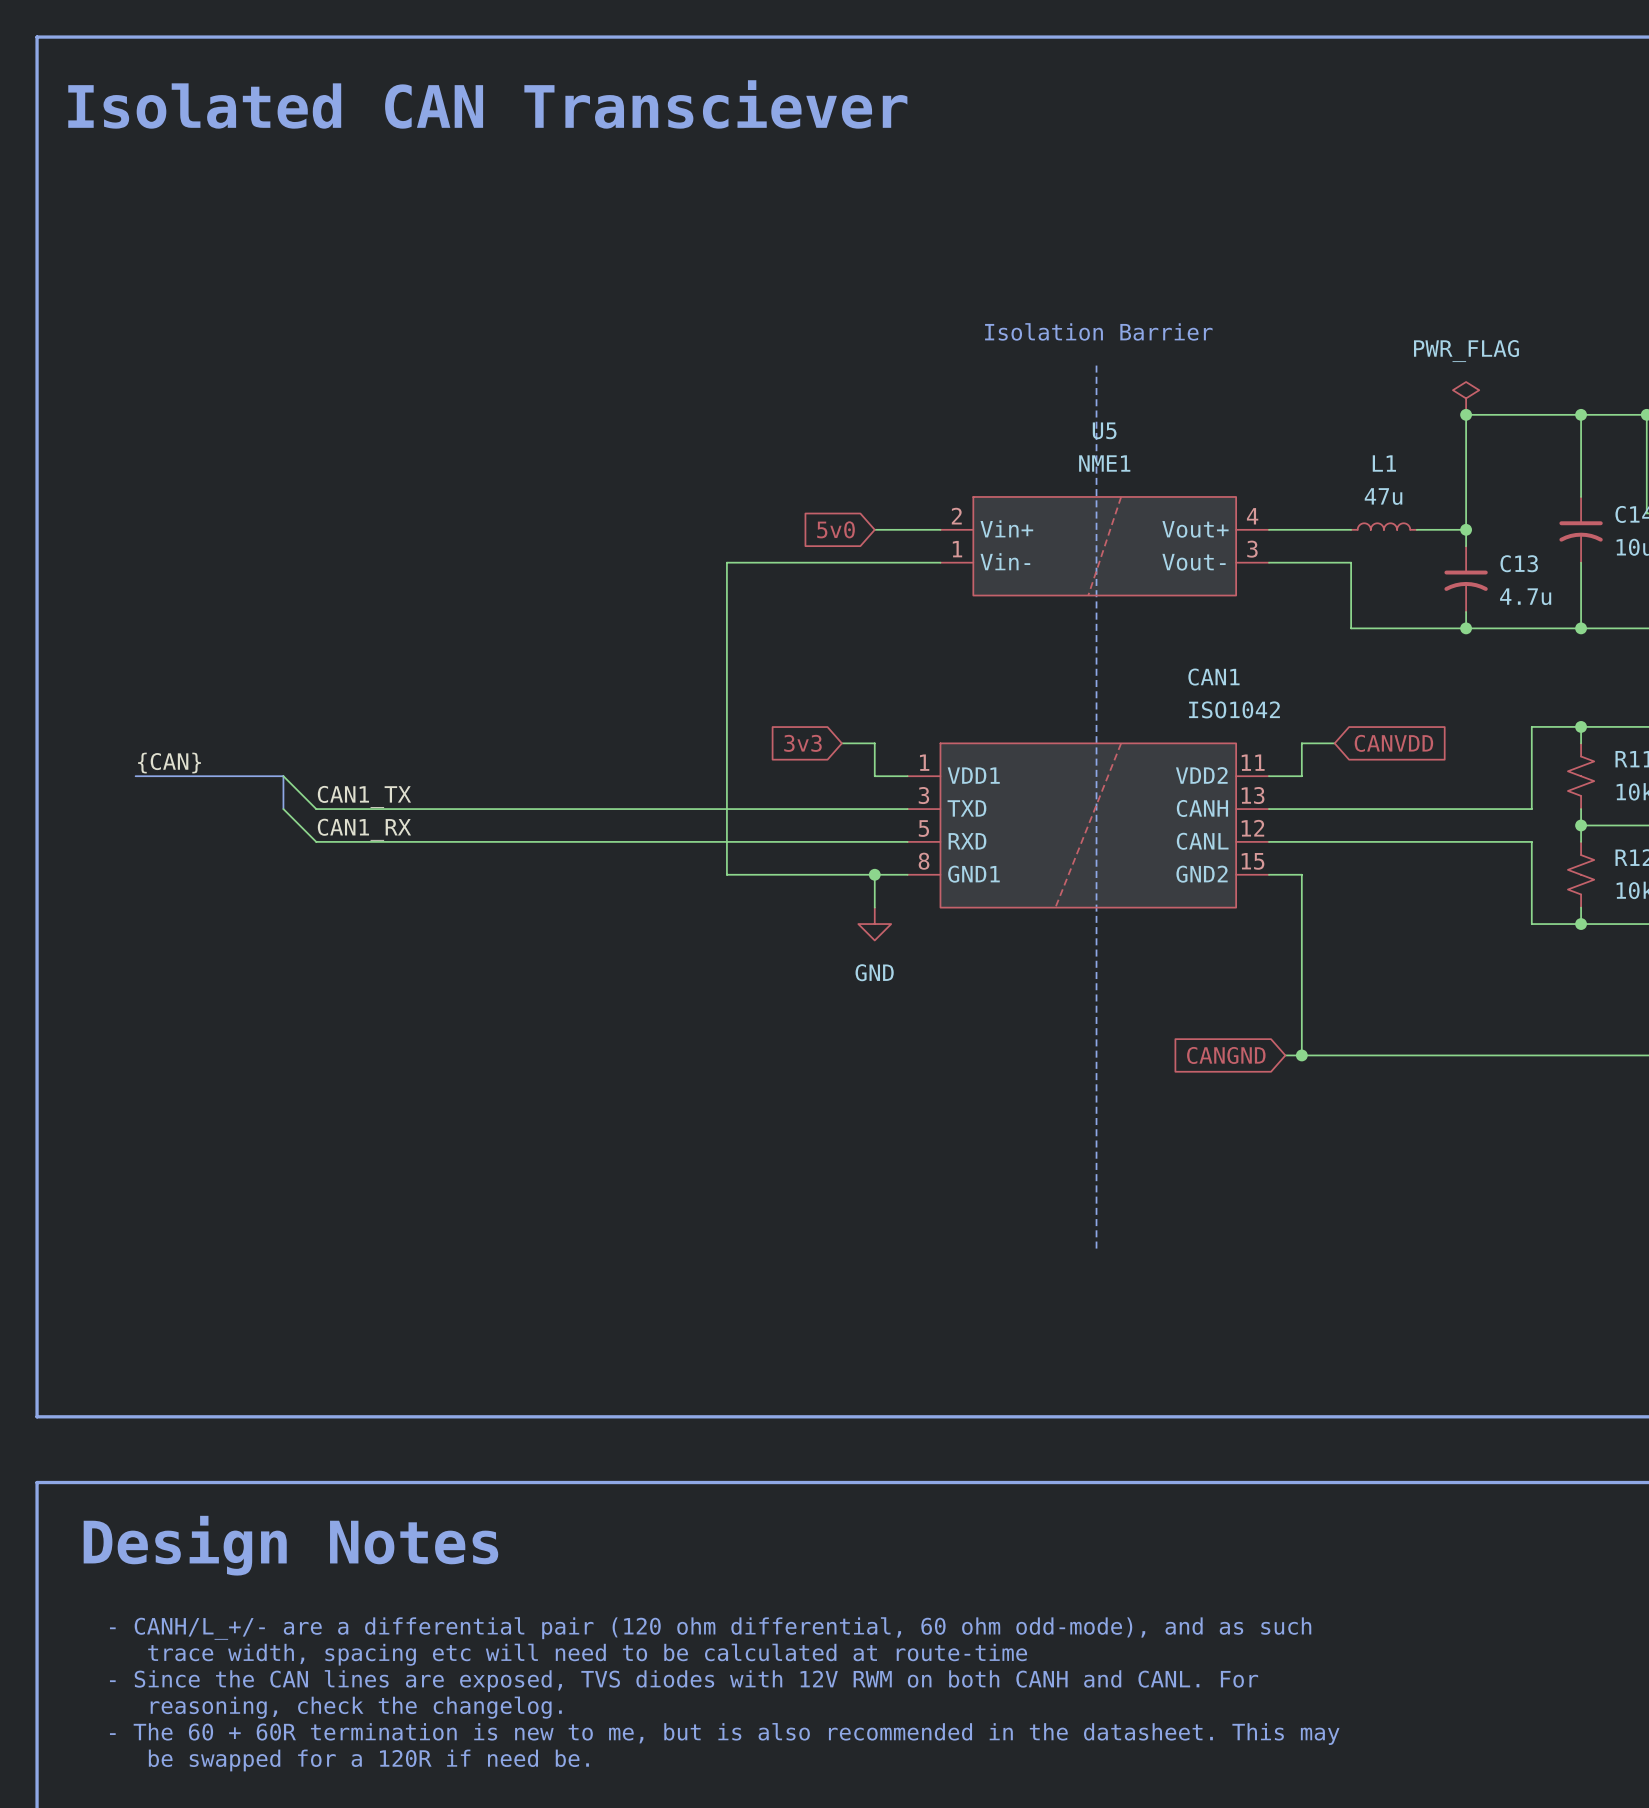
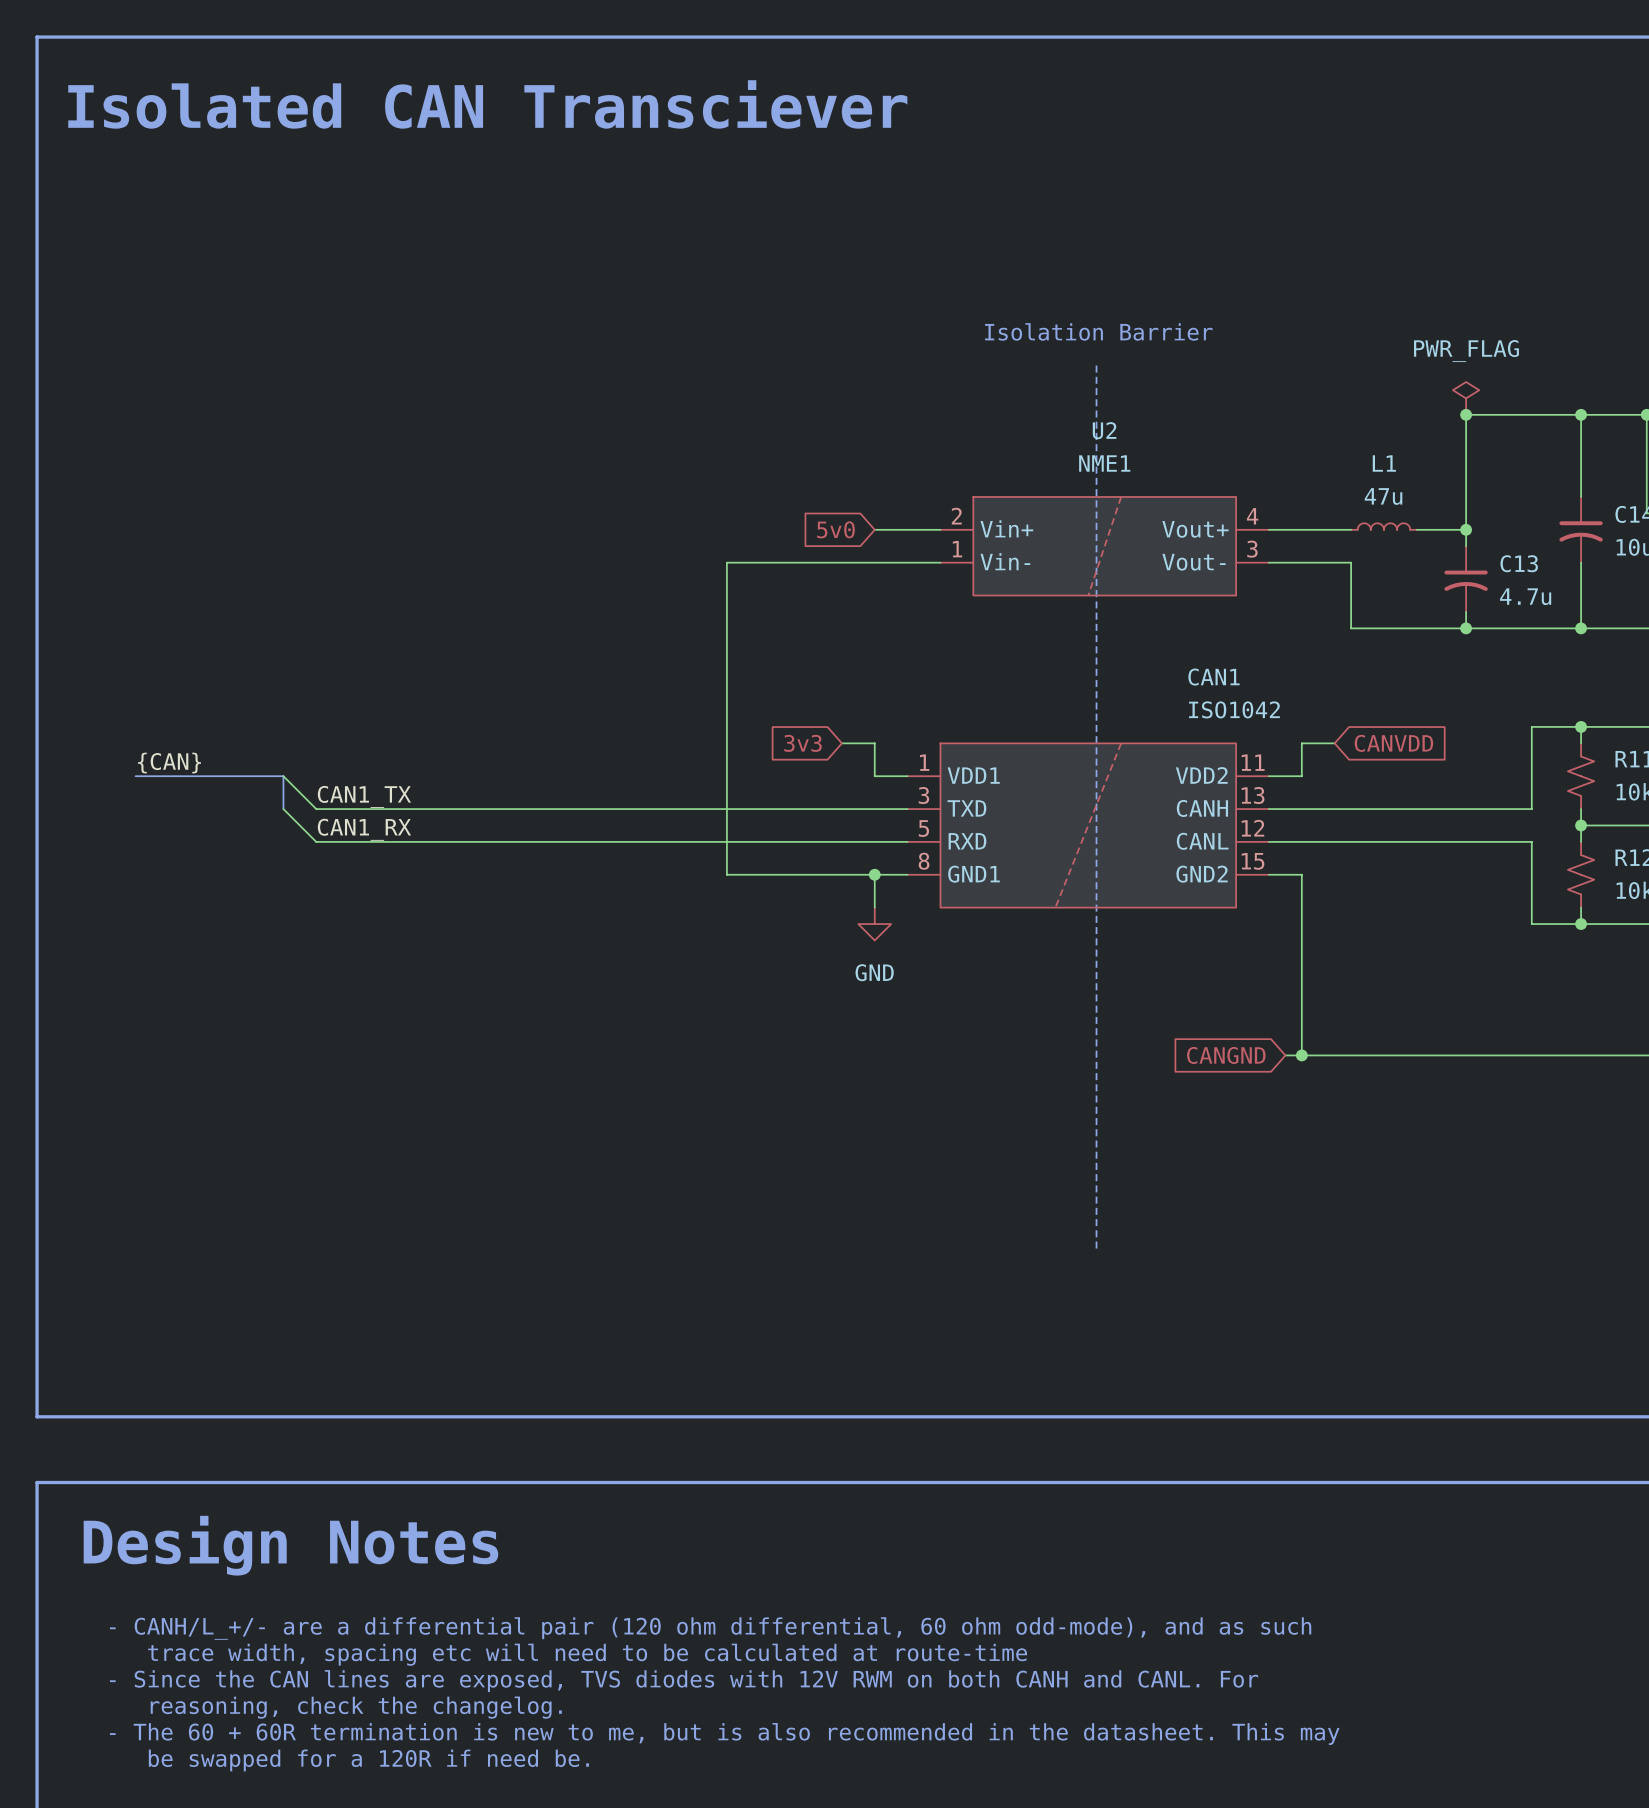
U5 name: U5 (1104, 430) -> U2 (1104, 430)

